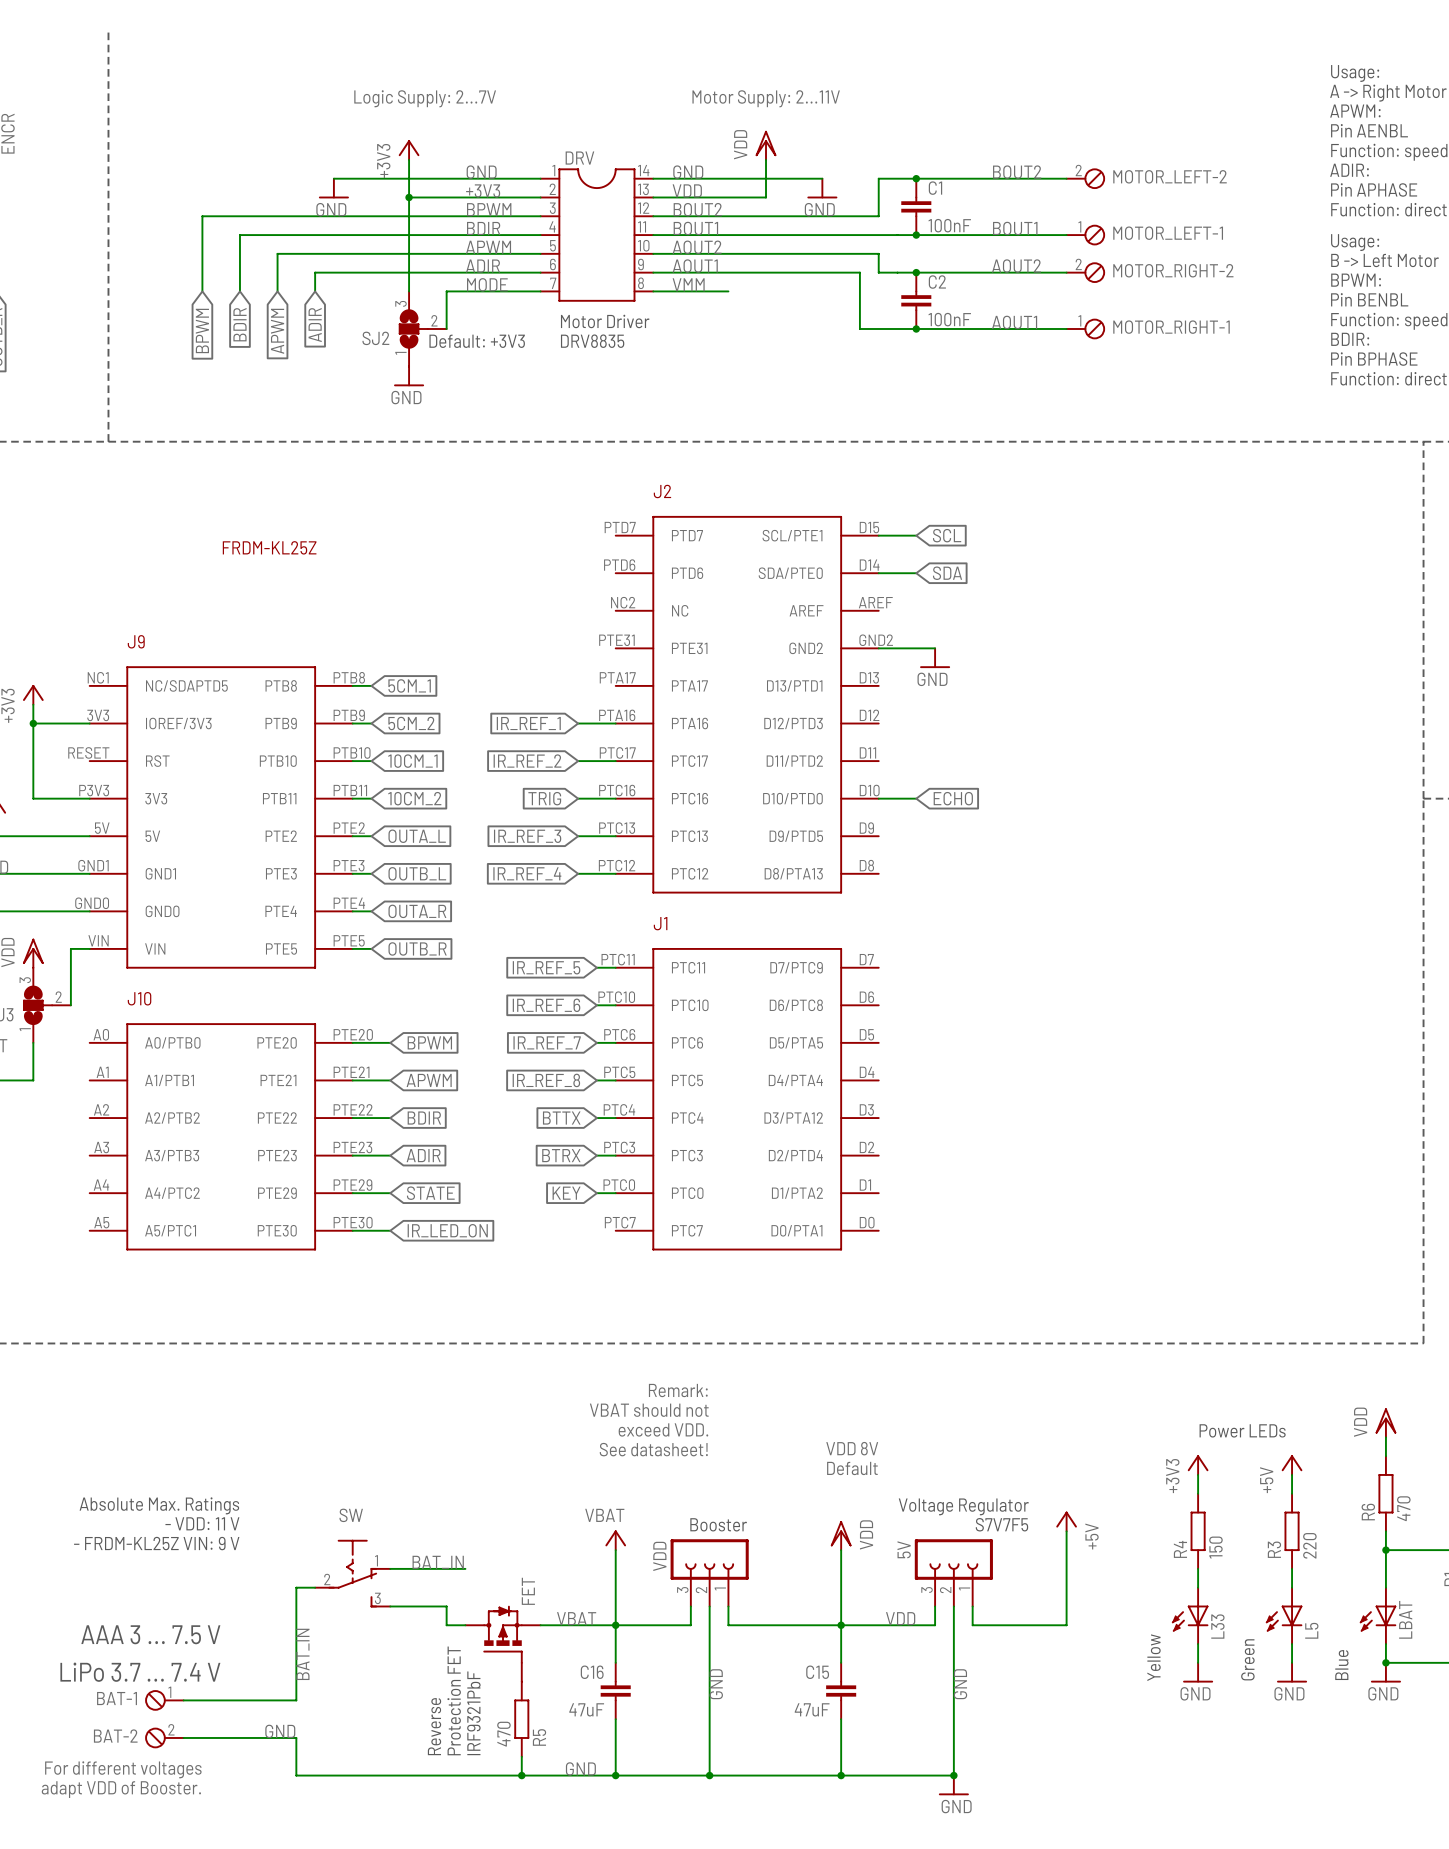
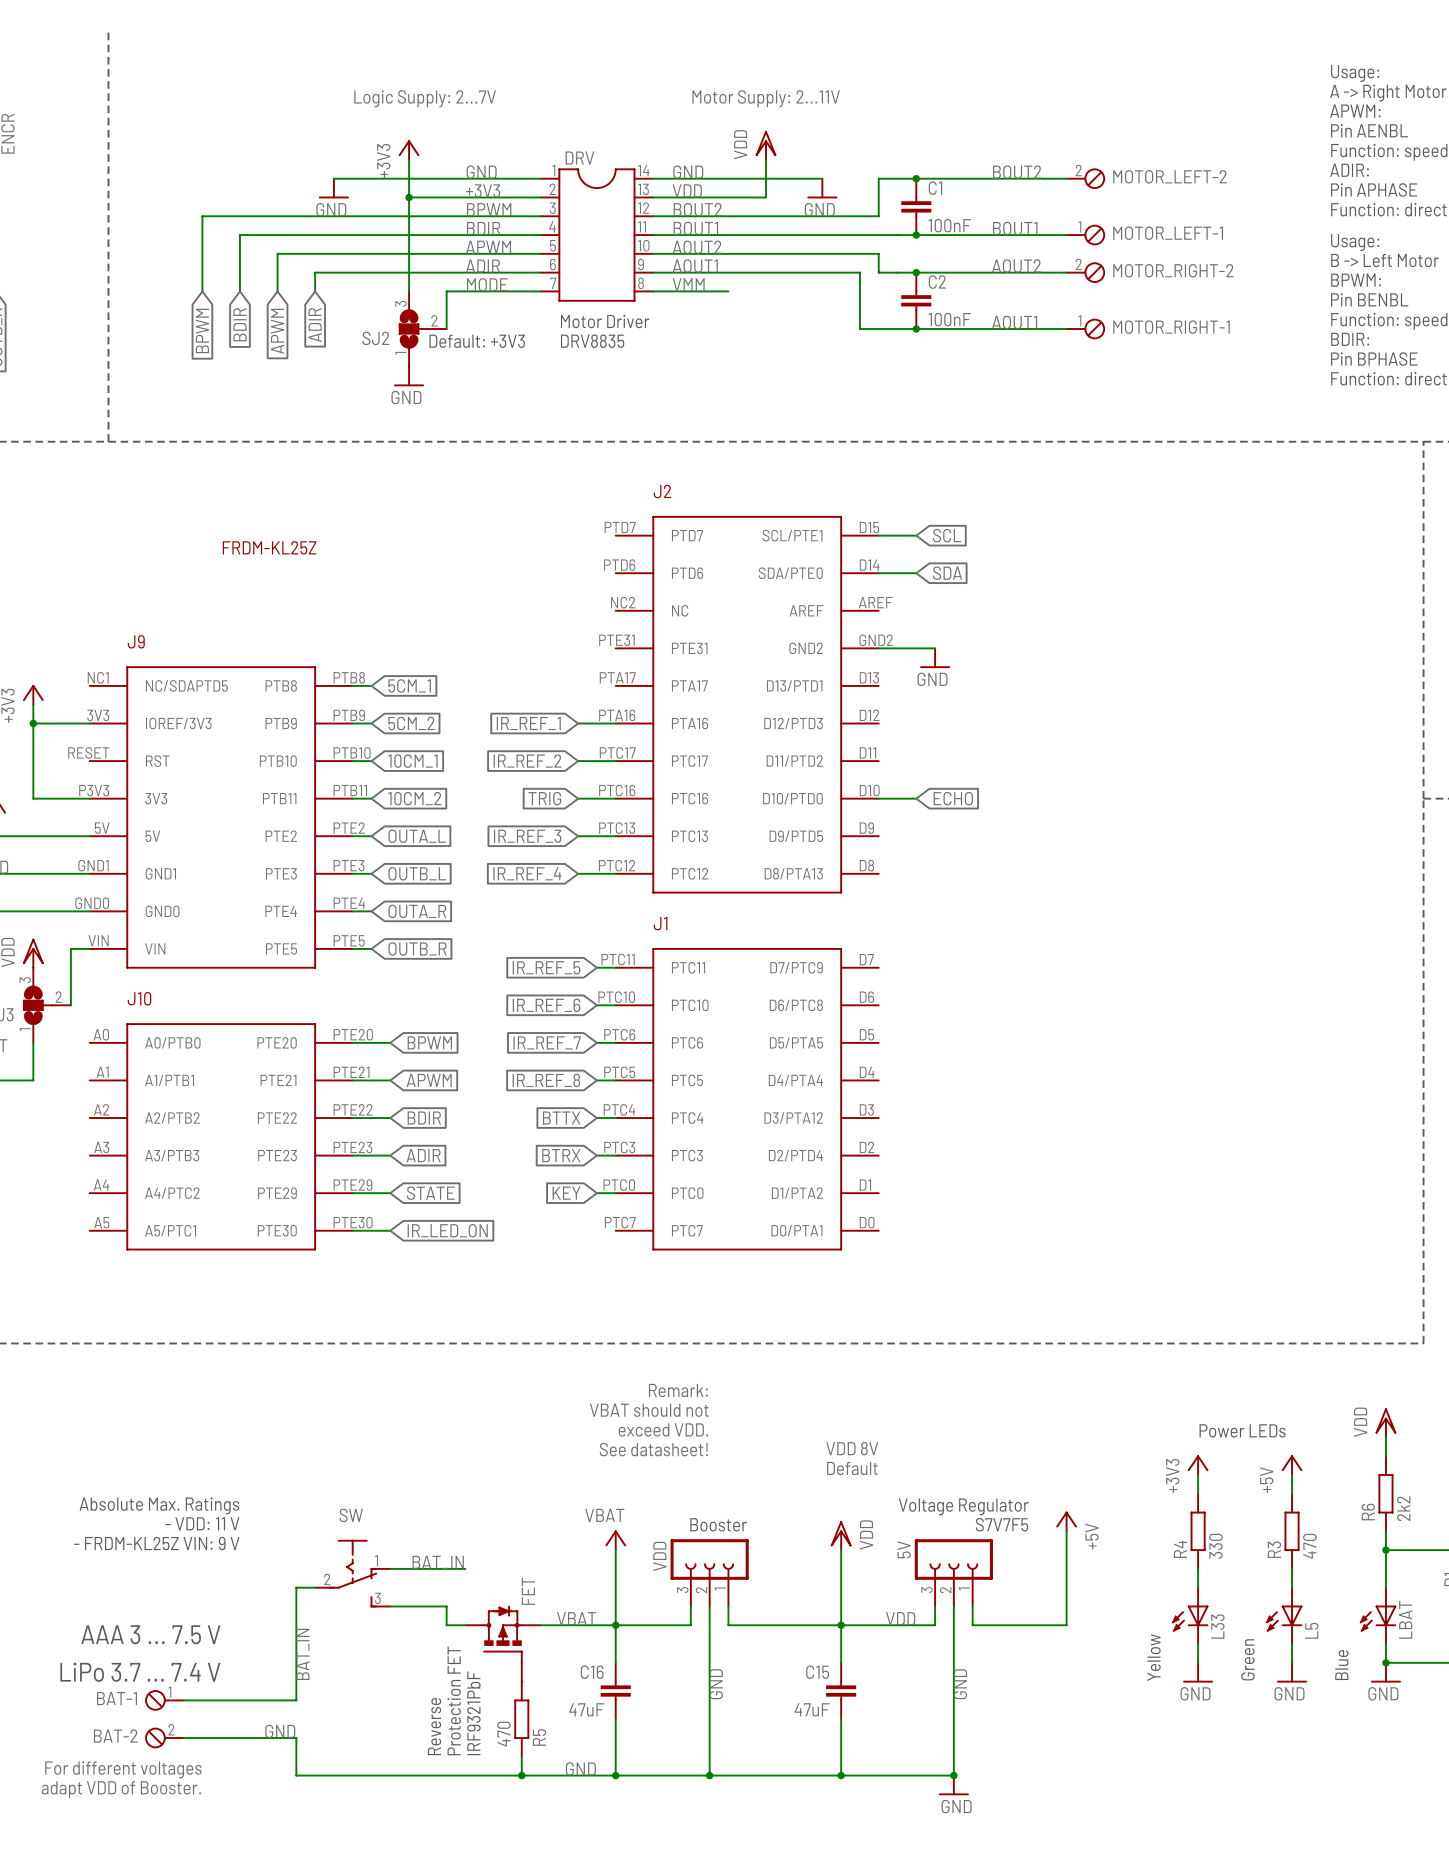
R6 value: 470 (1403, 1508) -> 2k2 (1403, 1508)
R3 value: 220 (1309, 1545) -> 470 (1309, 1546)
R4 value: 150 (1215, 1547) -> 330 (1215, 1546)

